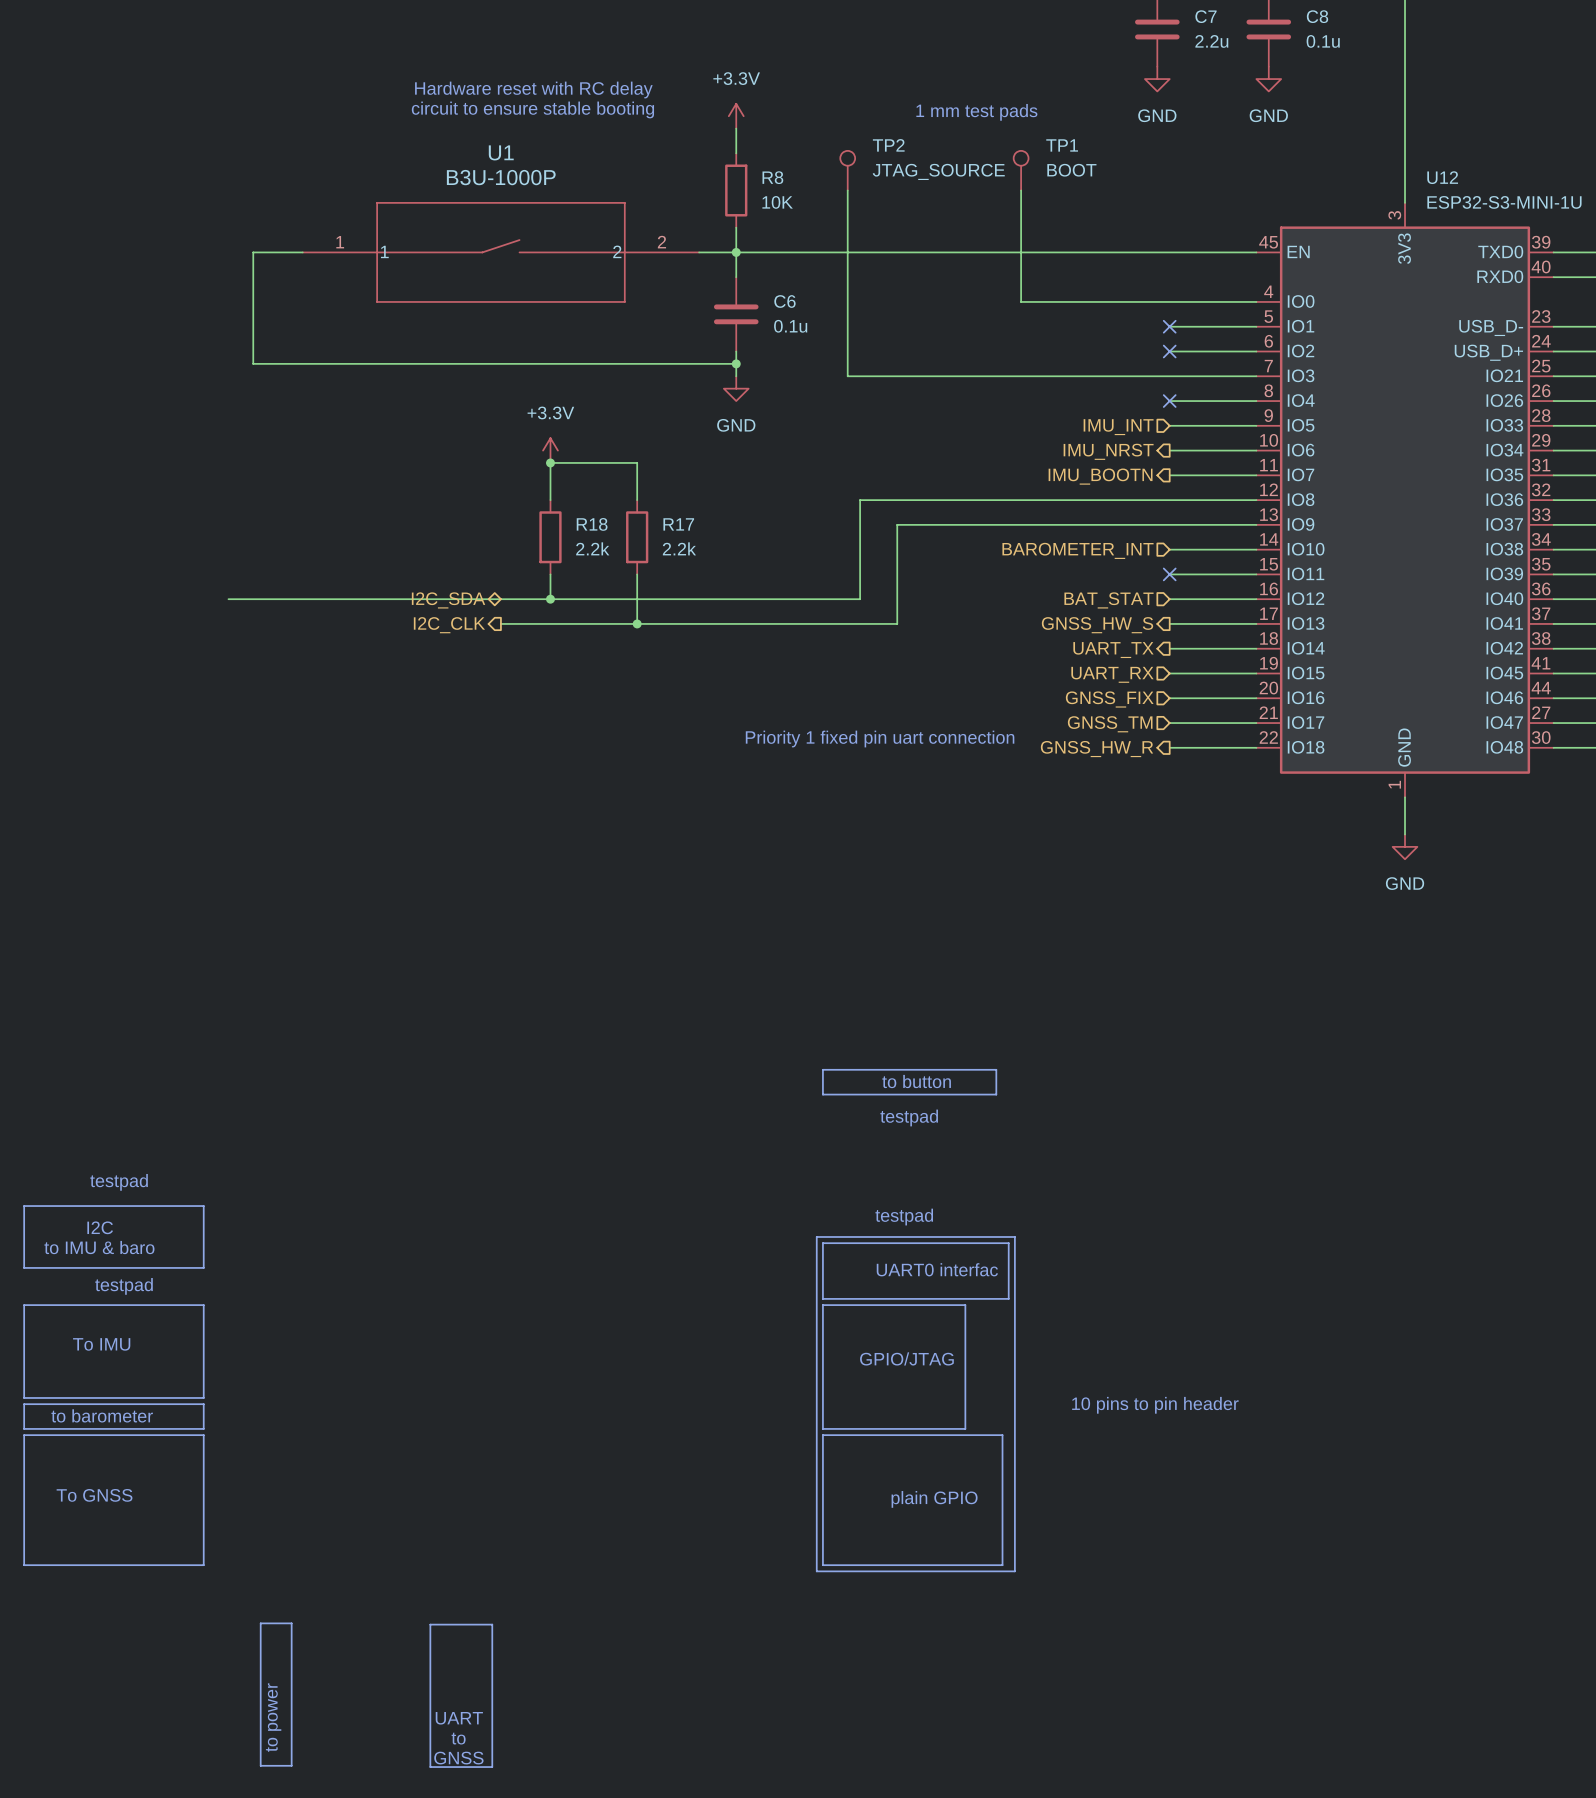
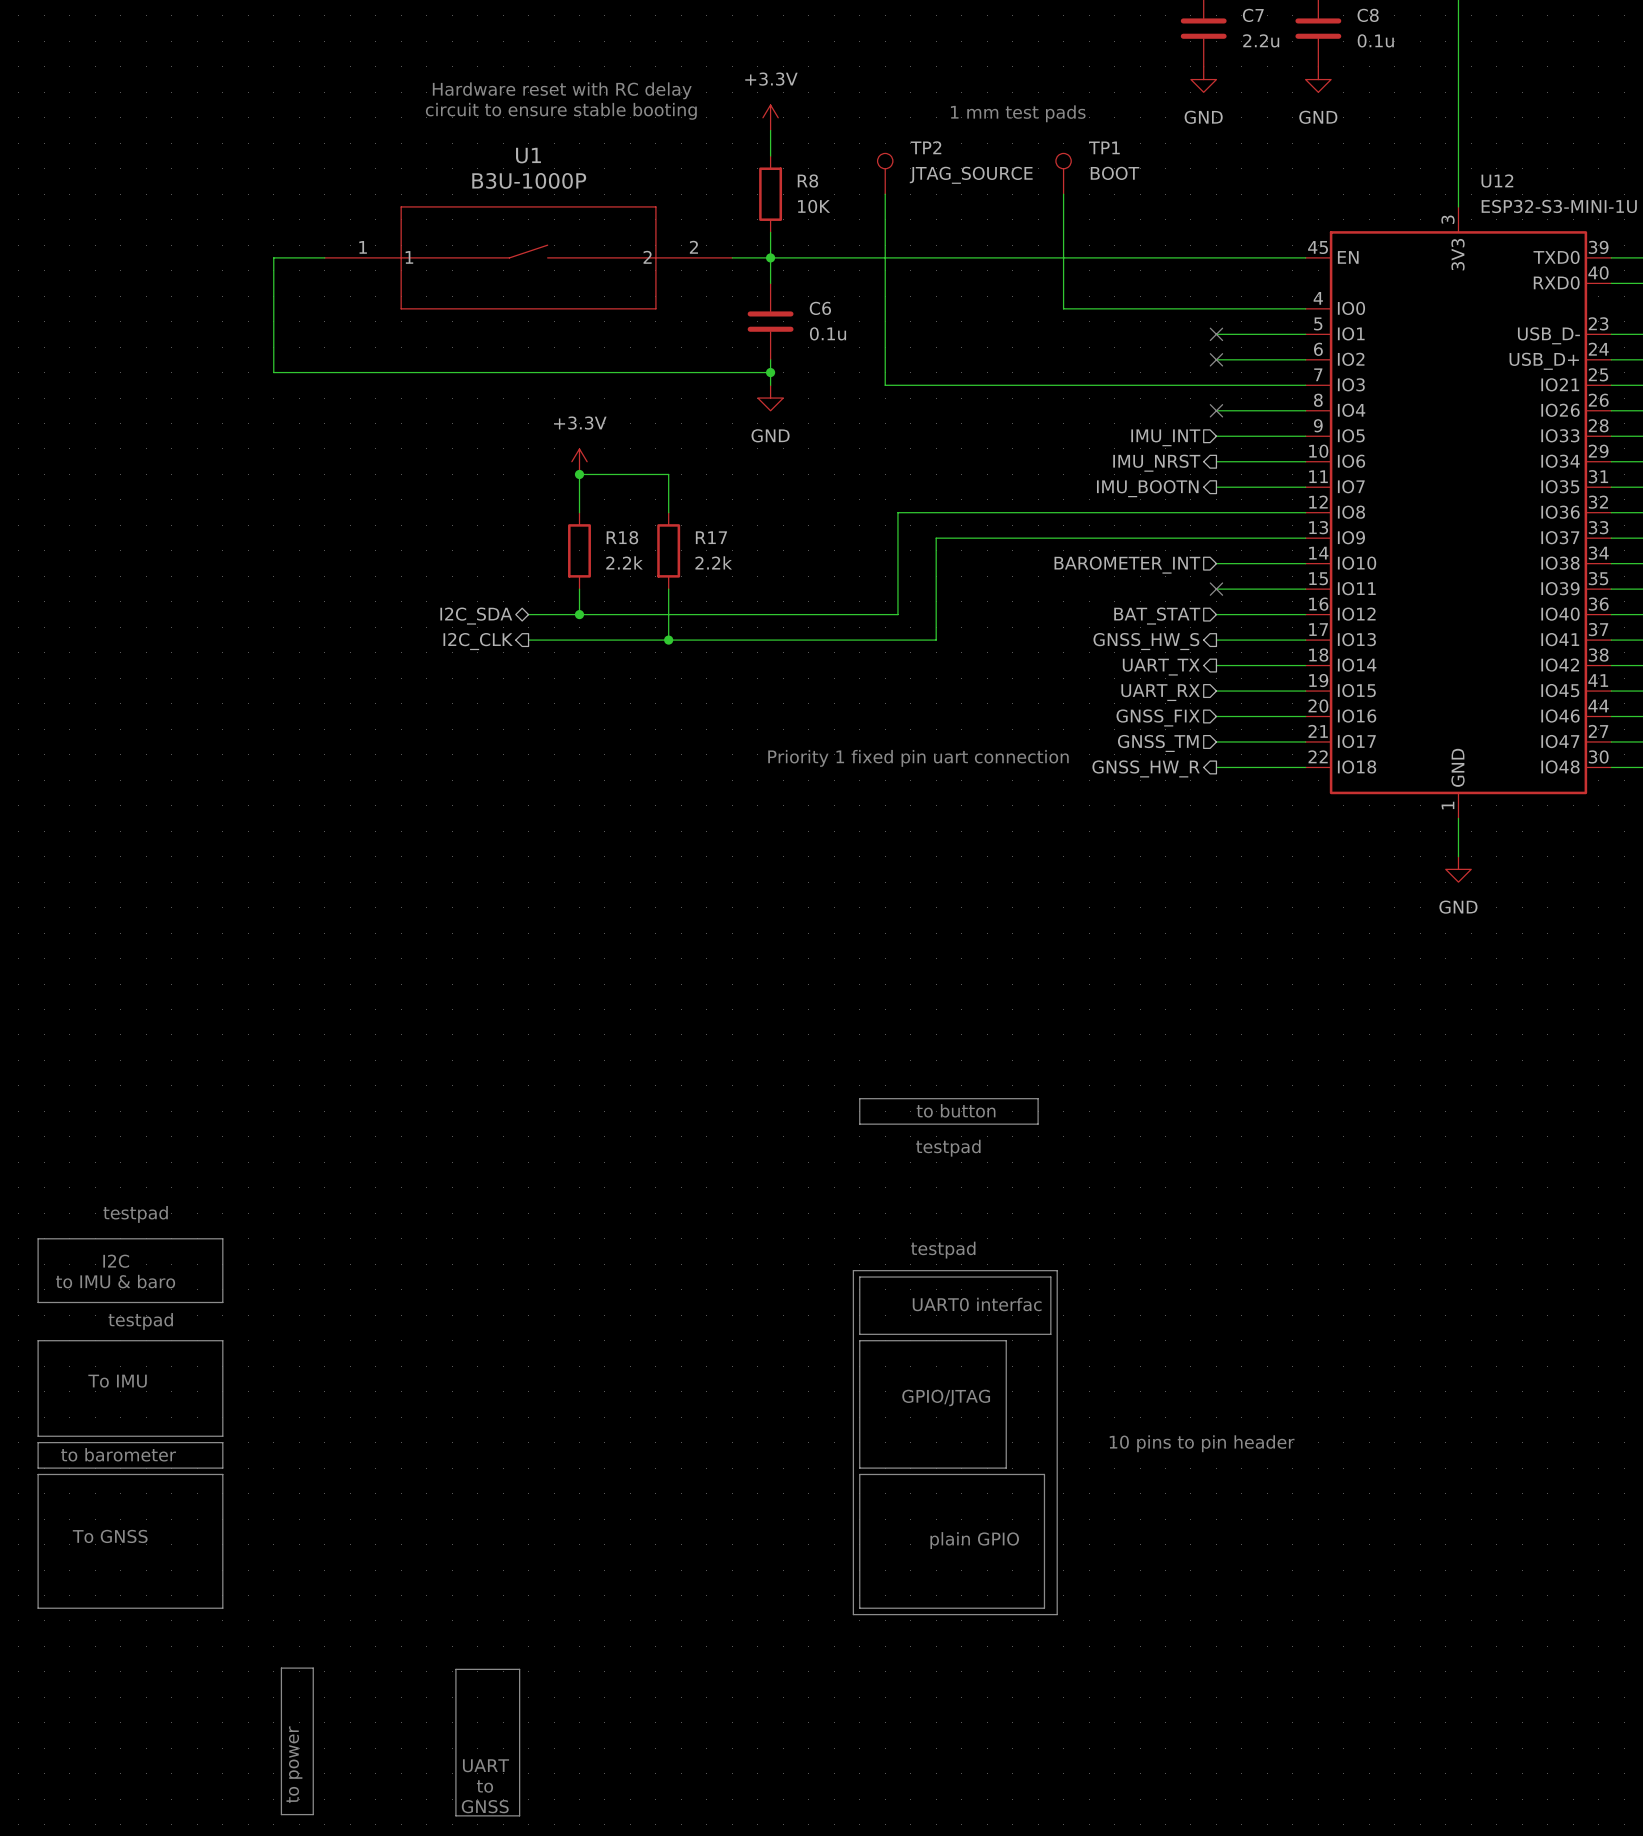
wire: (228, 599) (500, 599) -> none

